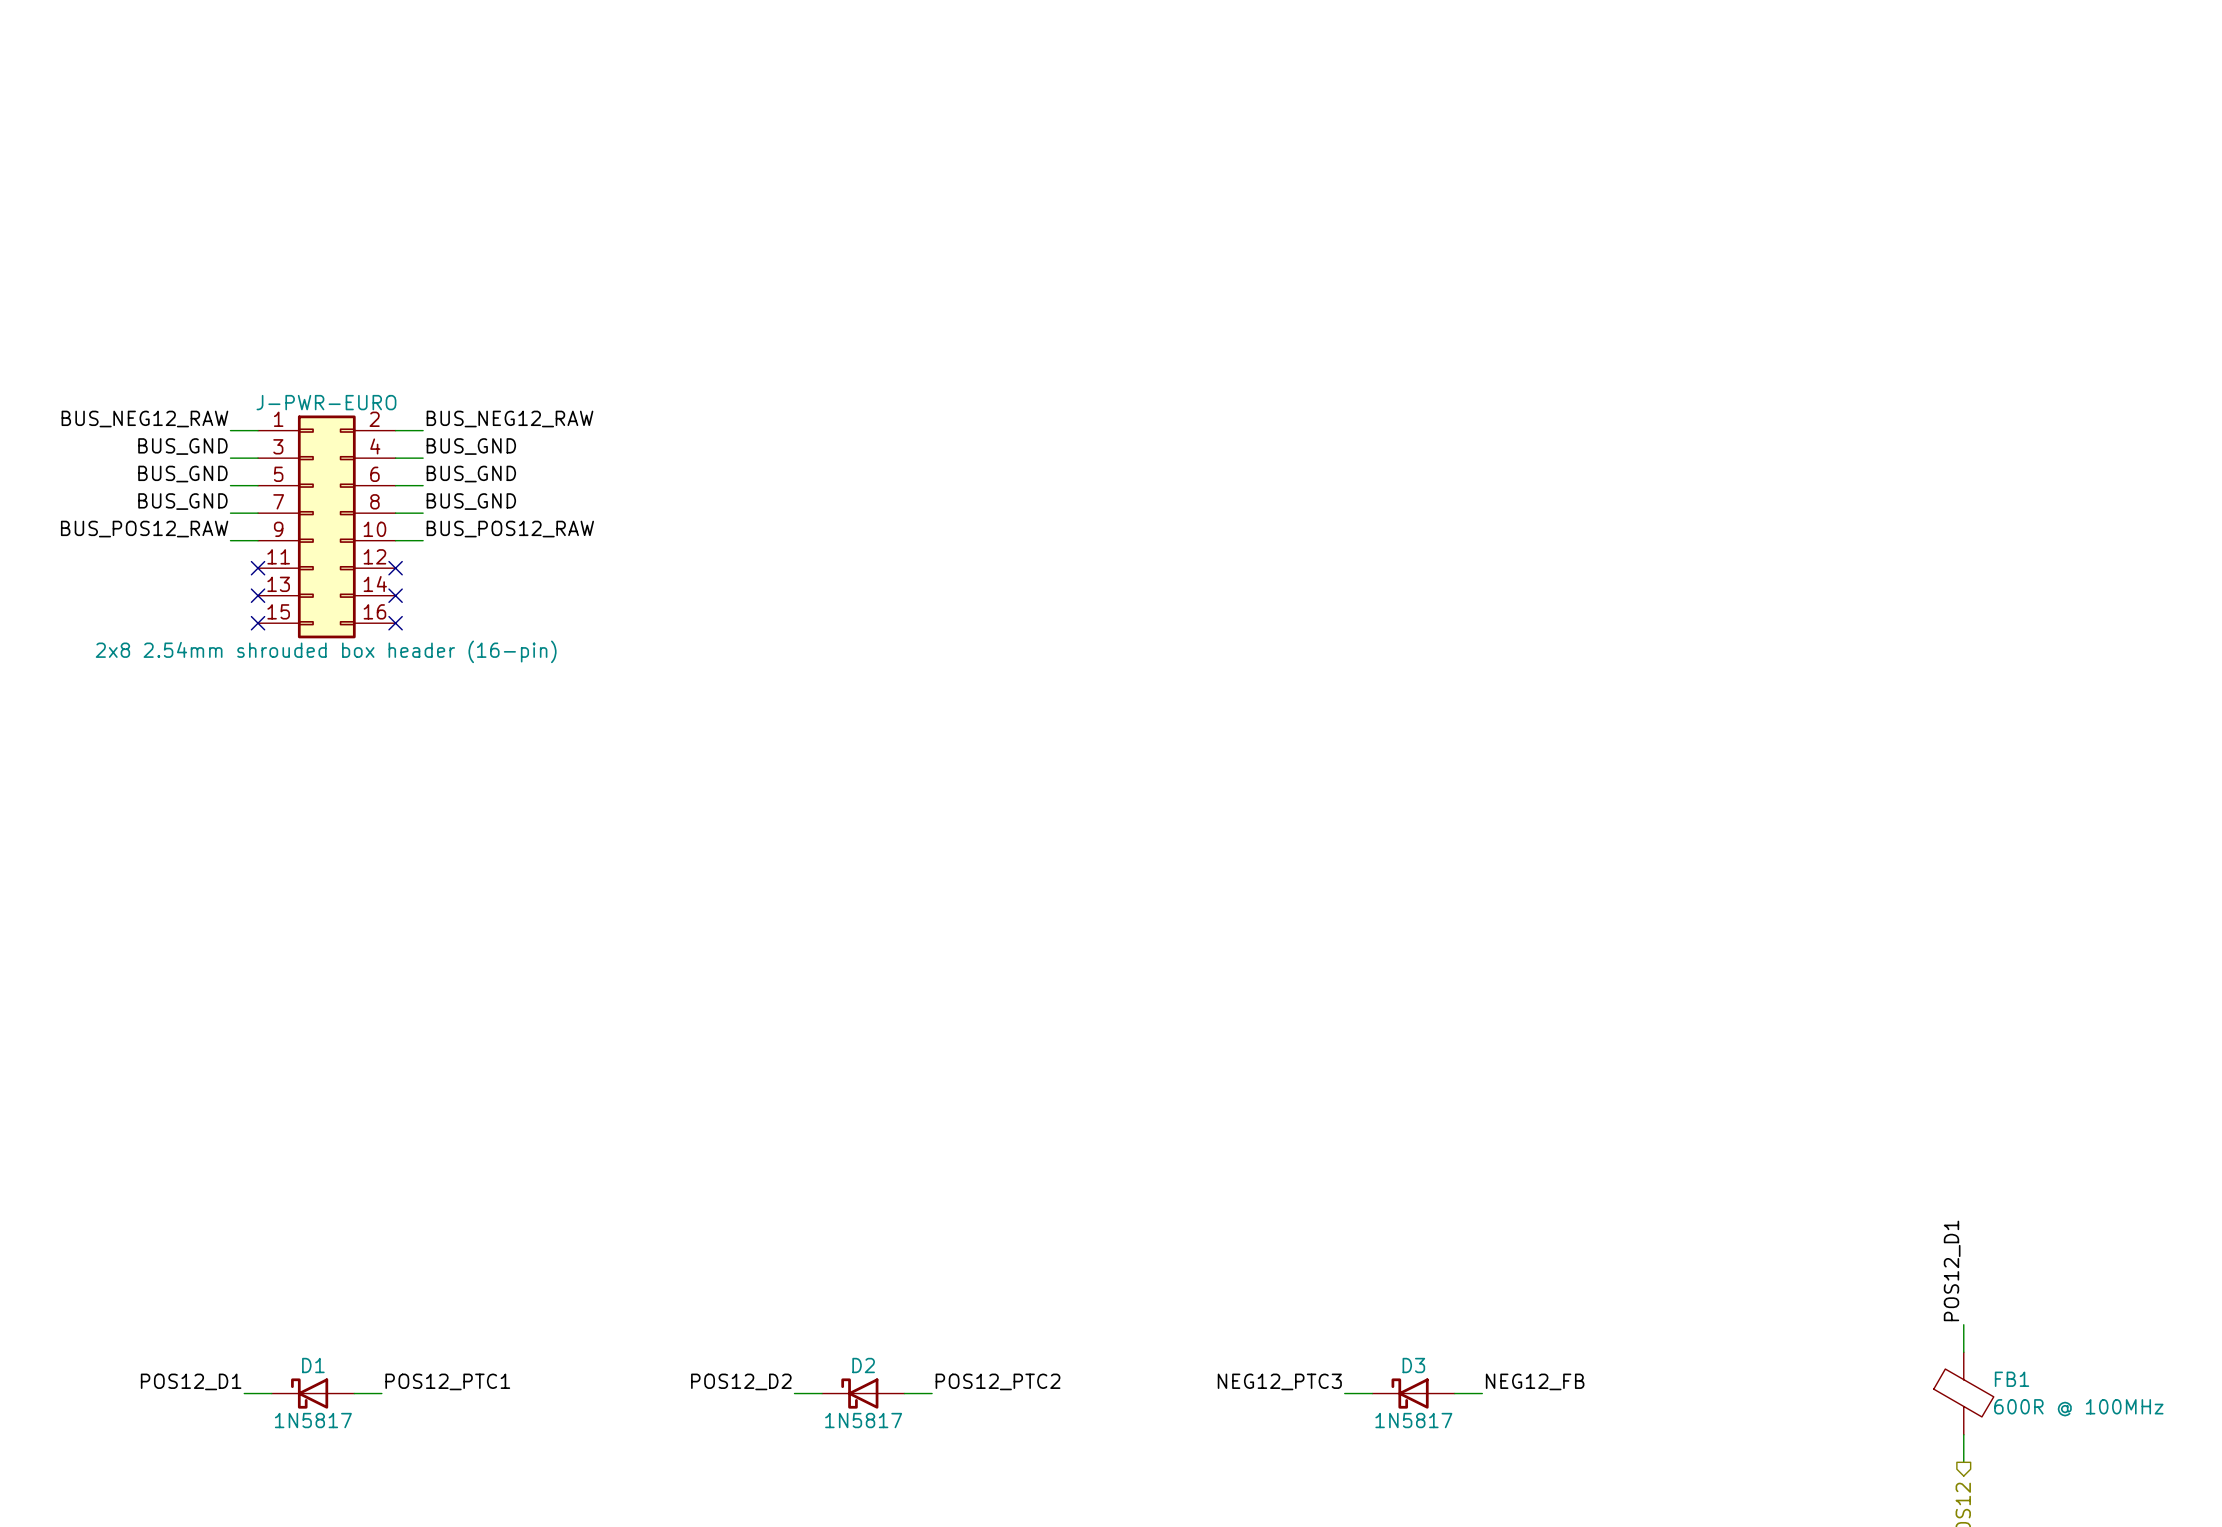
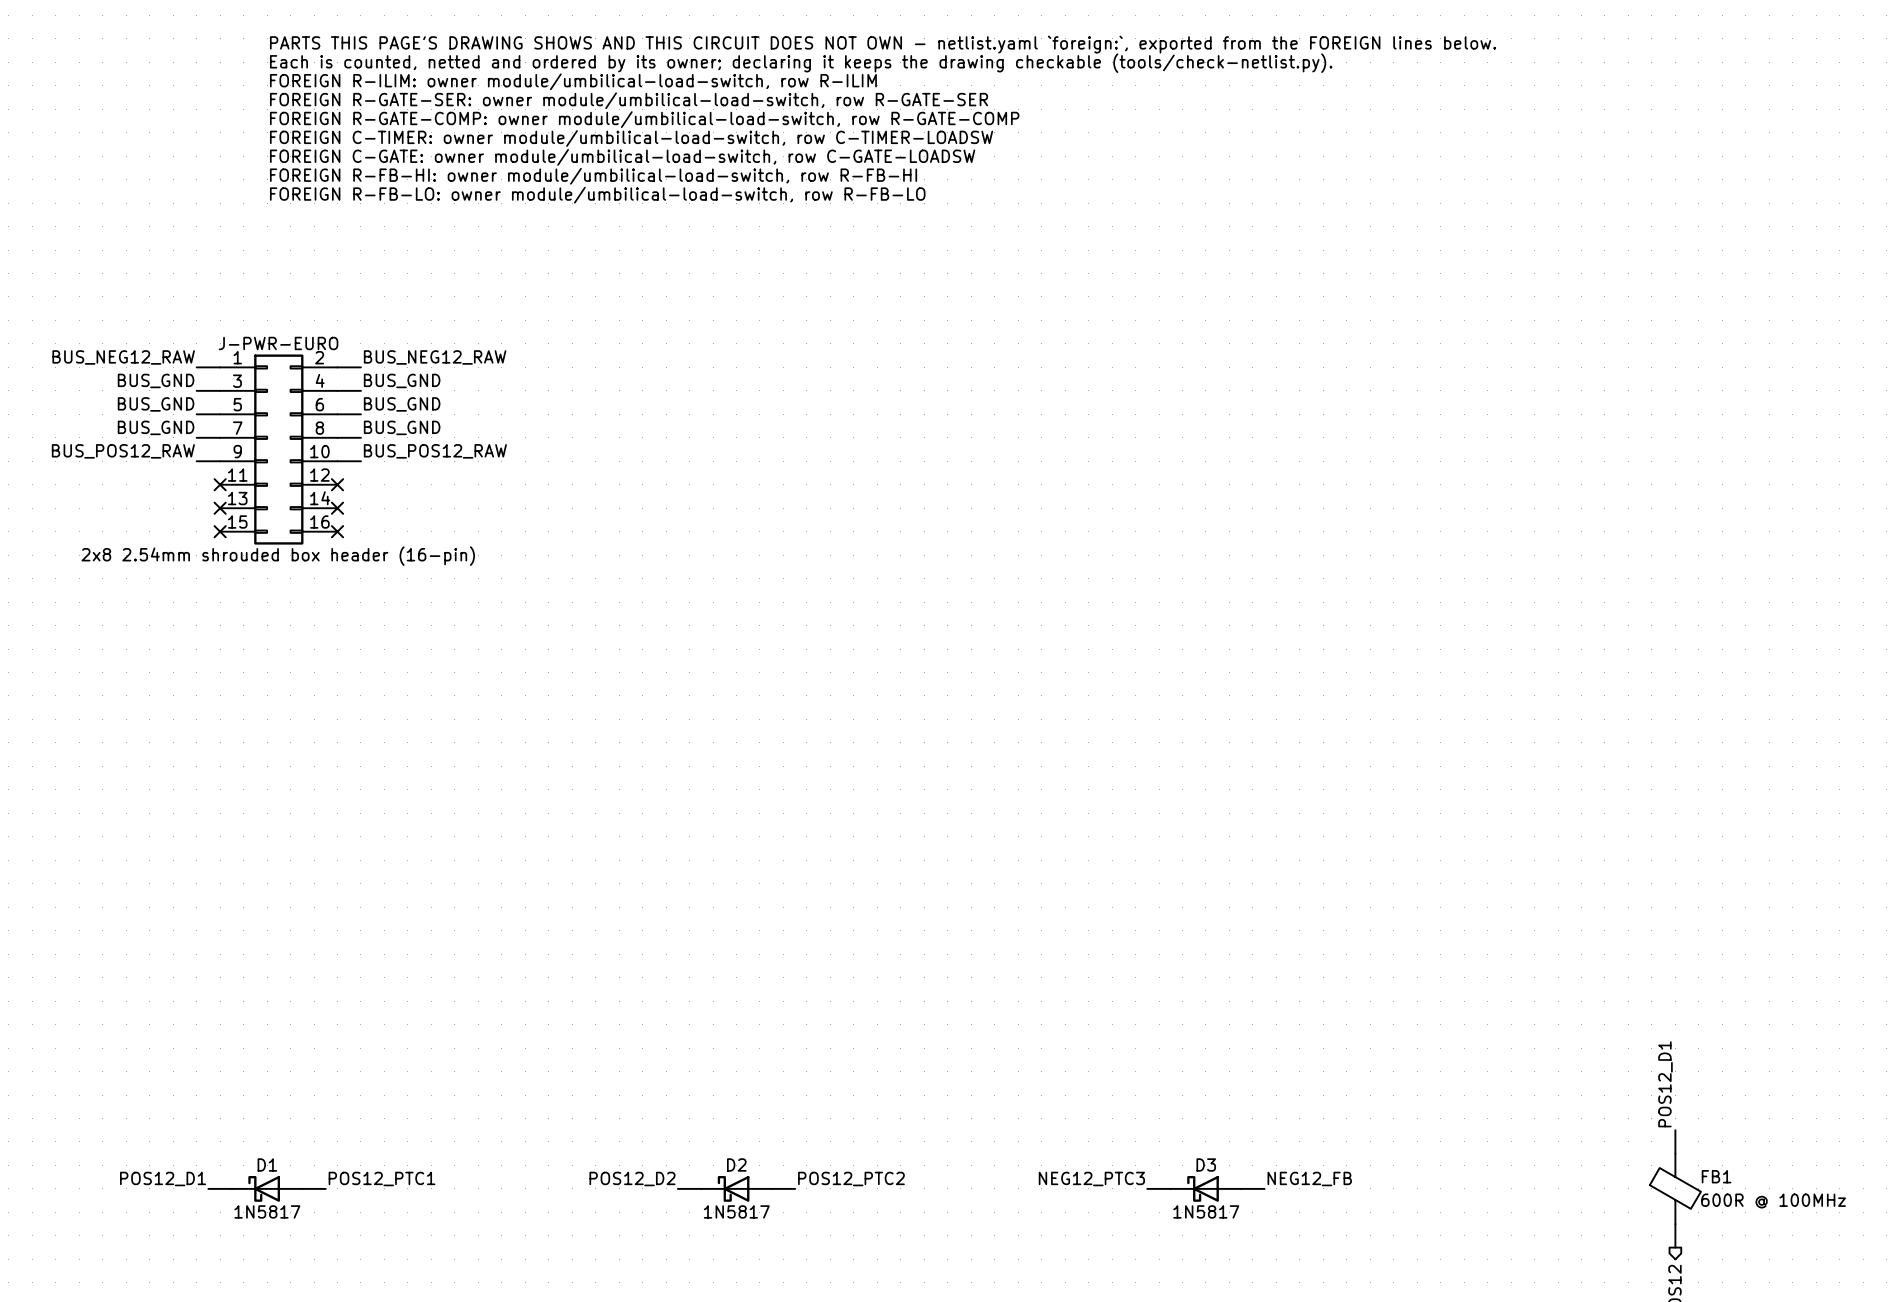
text: none -> PARTS THIS PAGE'S DRAWING SHOWS AND THIS CIRCUIT DOES NOT OWN - netlist.yaml `foreign:`, exported from the FOREIGN lines below. (883, 44)
text: none -> Each is counted, netted and ordered by its owner; declaring it keeps the drawing checkable (tools/check-netlist.py). (801, 63)
text: none -> FOREIGN R-ILIM: owner module/umbilical-load-switch, row R-ILIM (573, 81)
text: none -> FOREIGN R-GATE-SER: owner module/umbilical-load-switch, row R-GATE-SER (629, 100)
text: none -> FOREIGN R-GATE-COMP: owner module/umbilical-load-switch, row R-GATE-COMP (644, 119)
text: none -> FOREIGN C-TIMER: owner module/umbilical-load-switch, row C-TIMER-LOADSW (631, 138)
text: none -> FOREIGN C-GATE: owner module/umbilical-load-switch, row C-GATE-LOADSW (622, 157)
text: none -> FOREIGN R-FB-HI: owner module/umbilical-load-switch, row R-FB-HI (593, 176)
text: none -> FOREIGN R-FB-LO: owner module/umbilical-load-switch, row R-FB-LO (597, 195)

